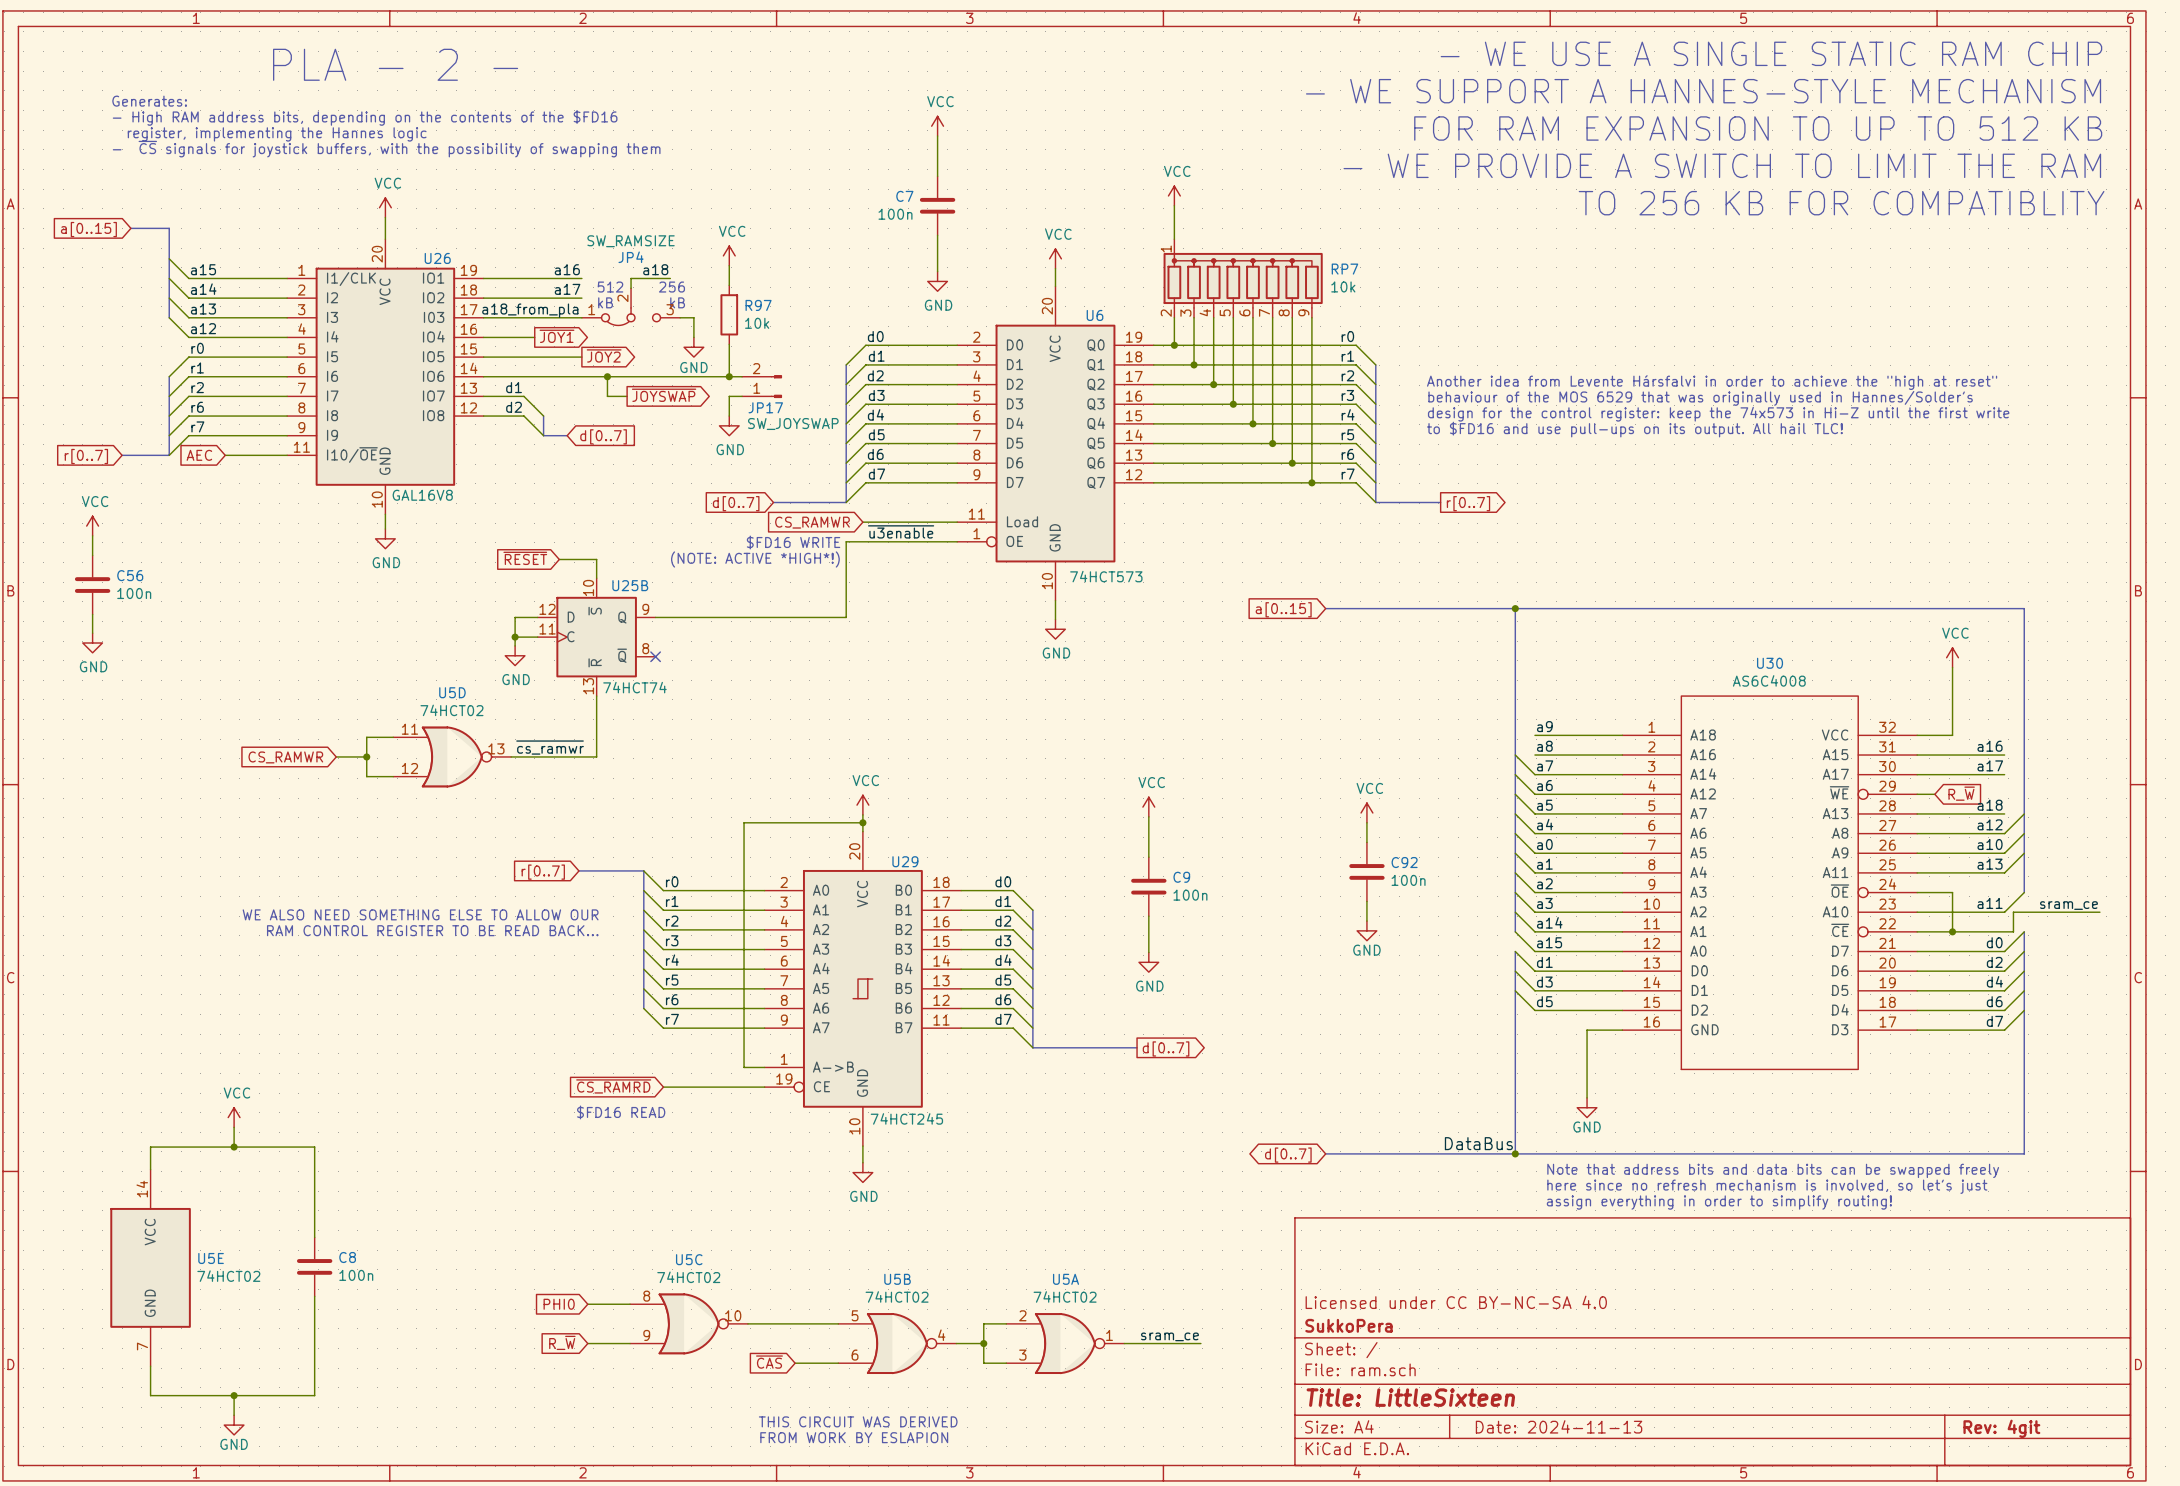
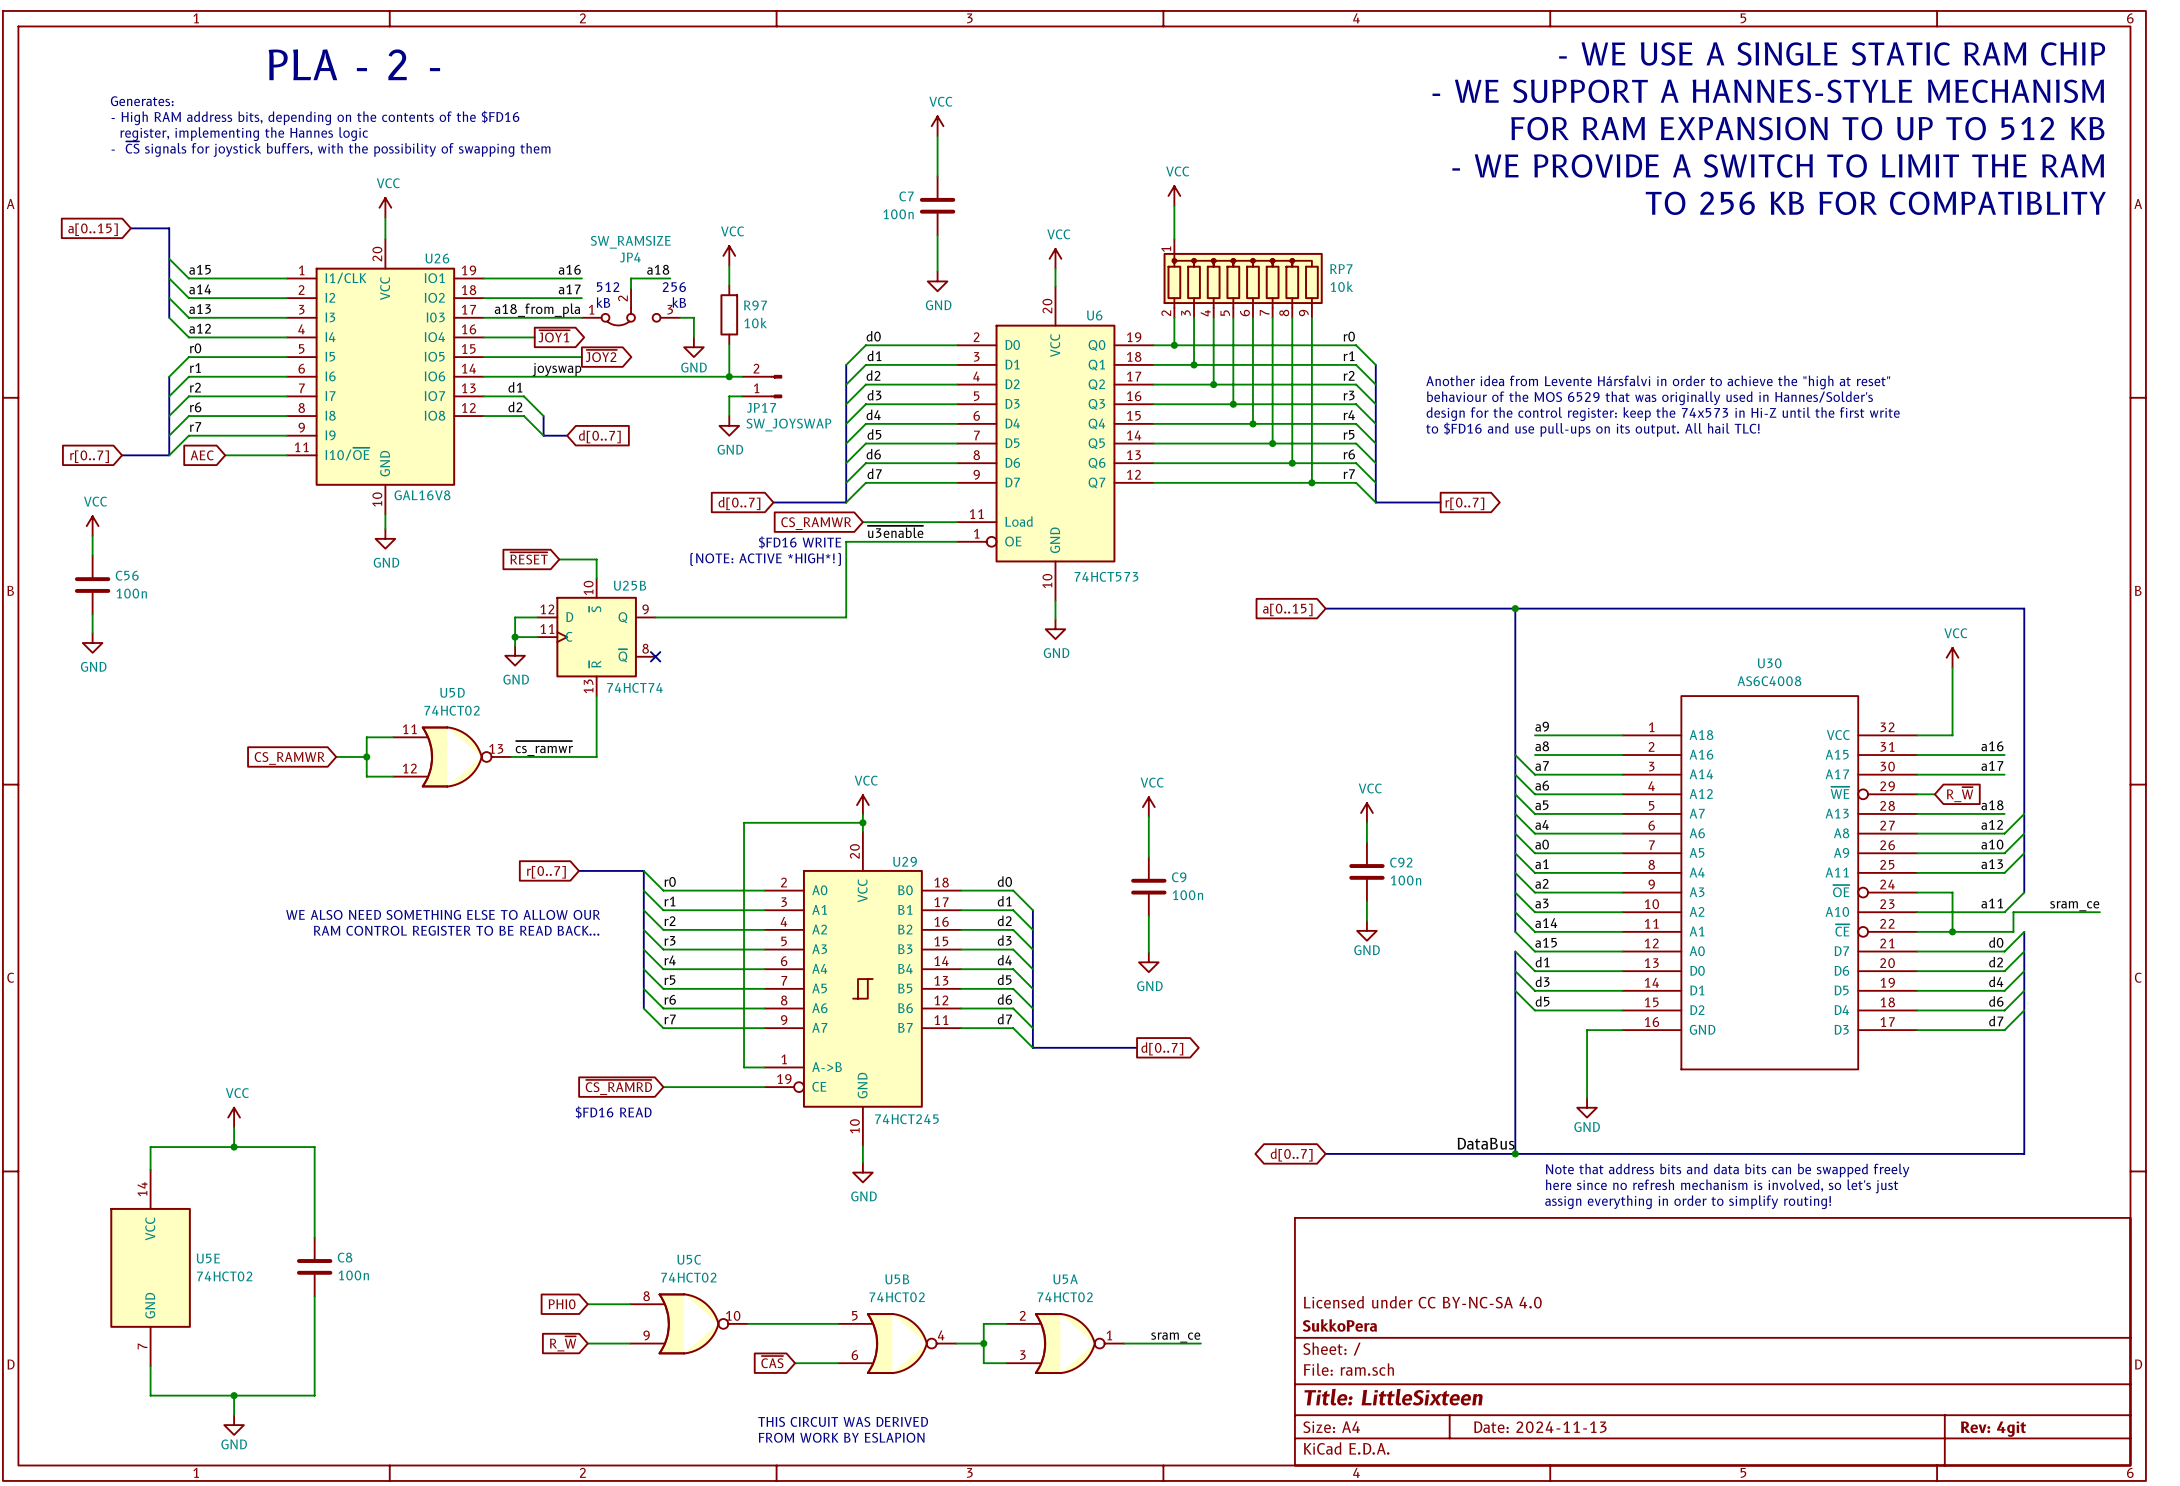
label: none -> joyswap (556, 369)
wire: (607, 376) (607, 396) (627, 396) -> none
junction: (607, 376) -> none
global label: ~{JOYSWAP} (664, 395) -> none

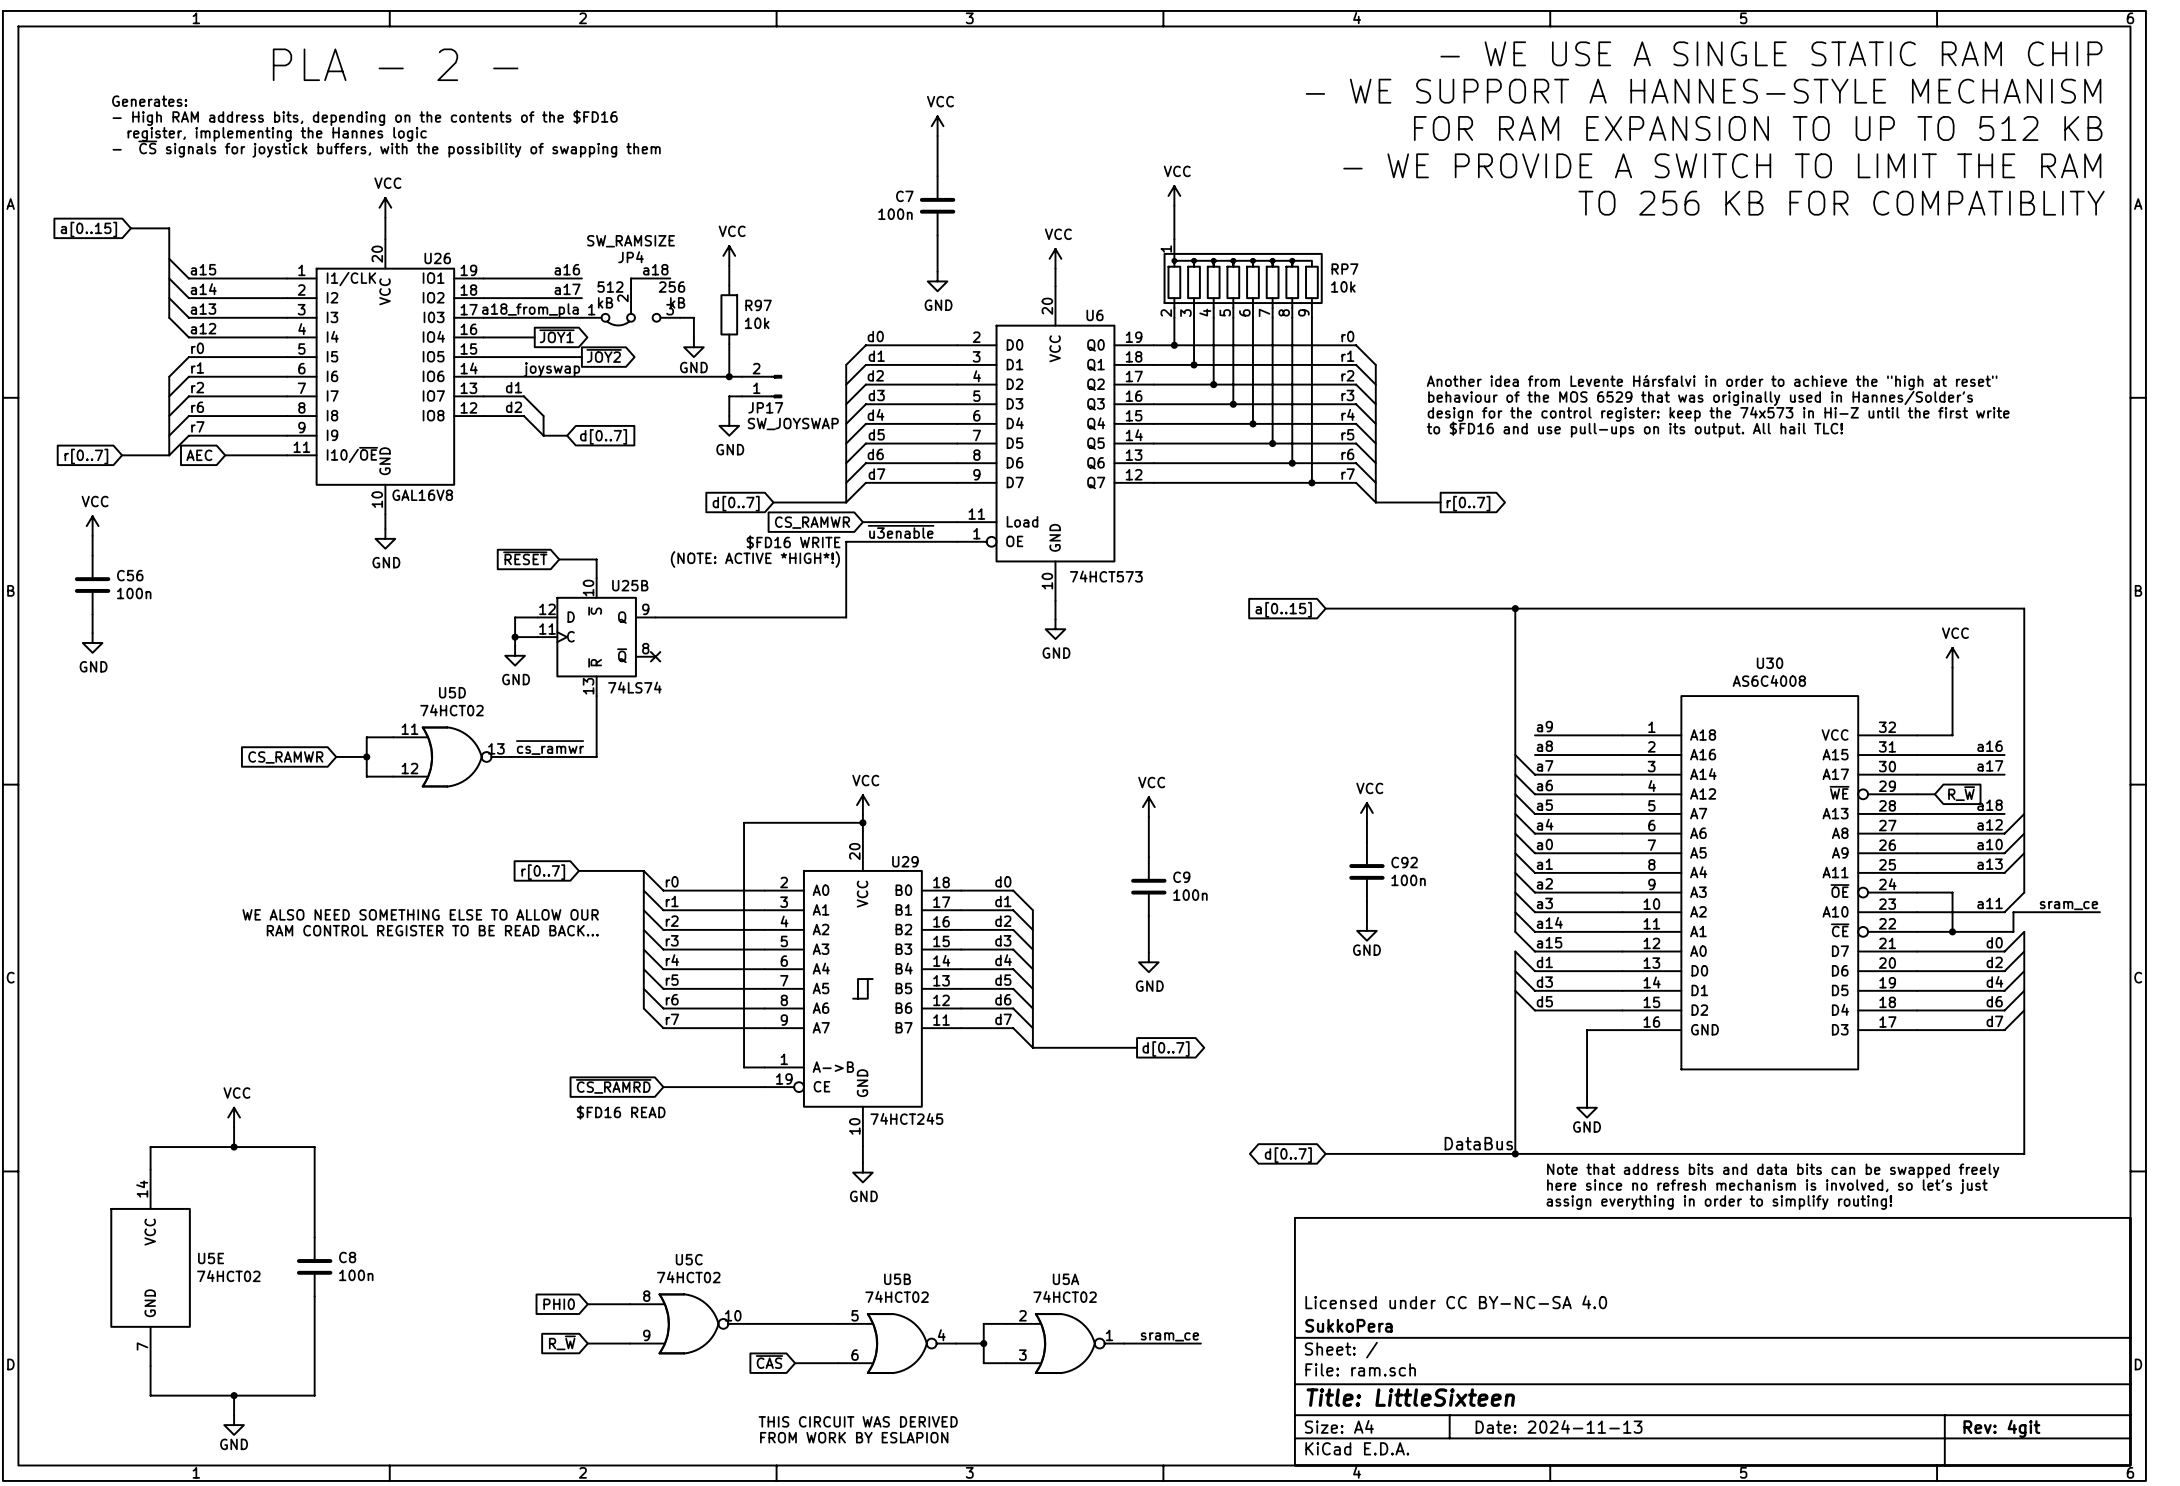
U25B value: 74HCT74 (634, 687) -> 74LS74 (634, 687)

